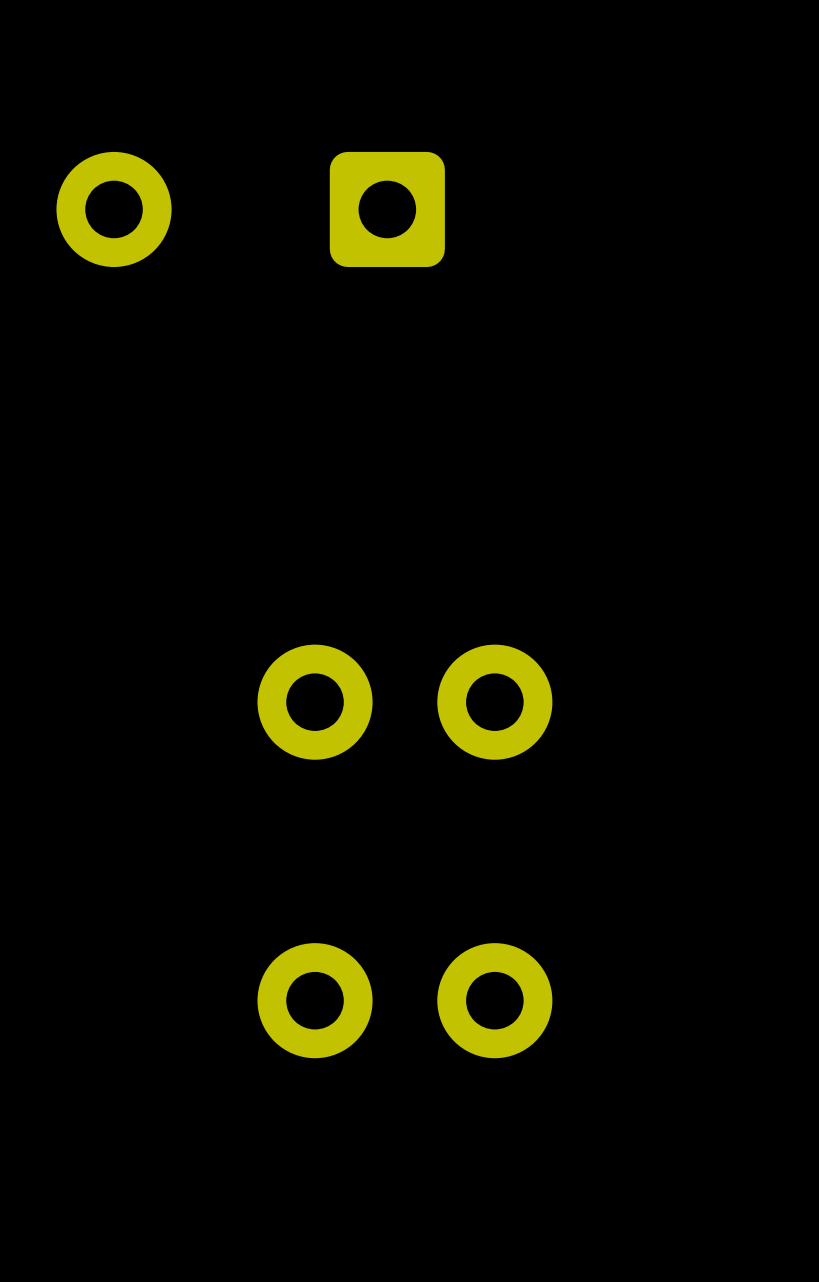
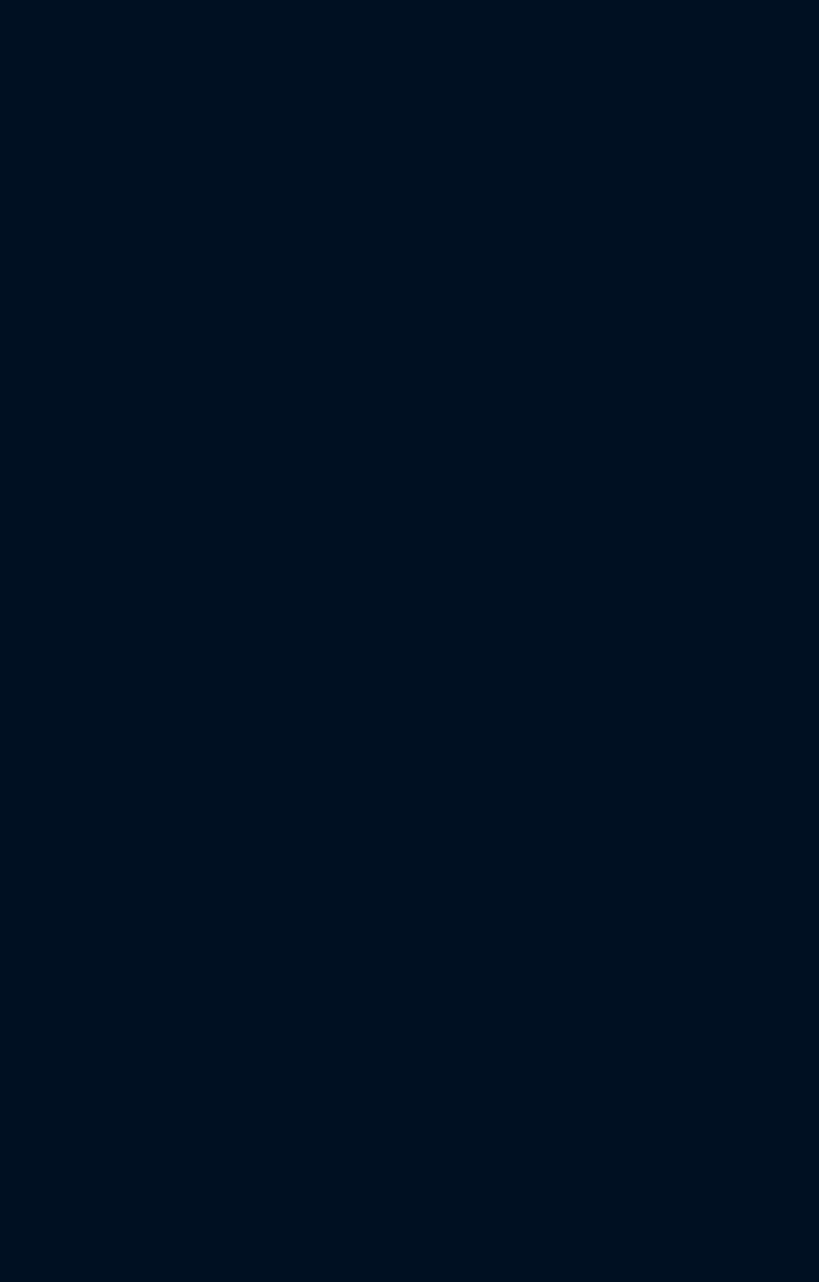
part: (250, 209) -> none
part: (404, 702) -> none
part: (404, 1000) -> none

